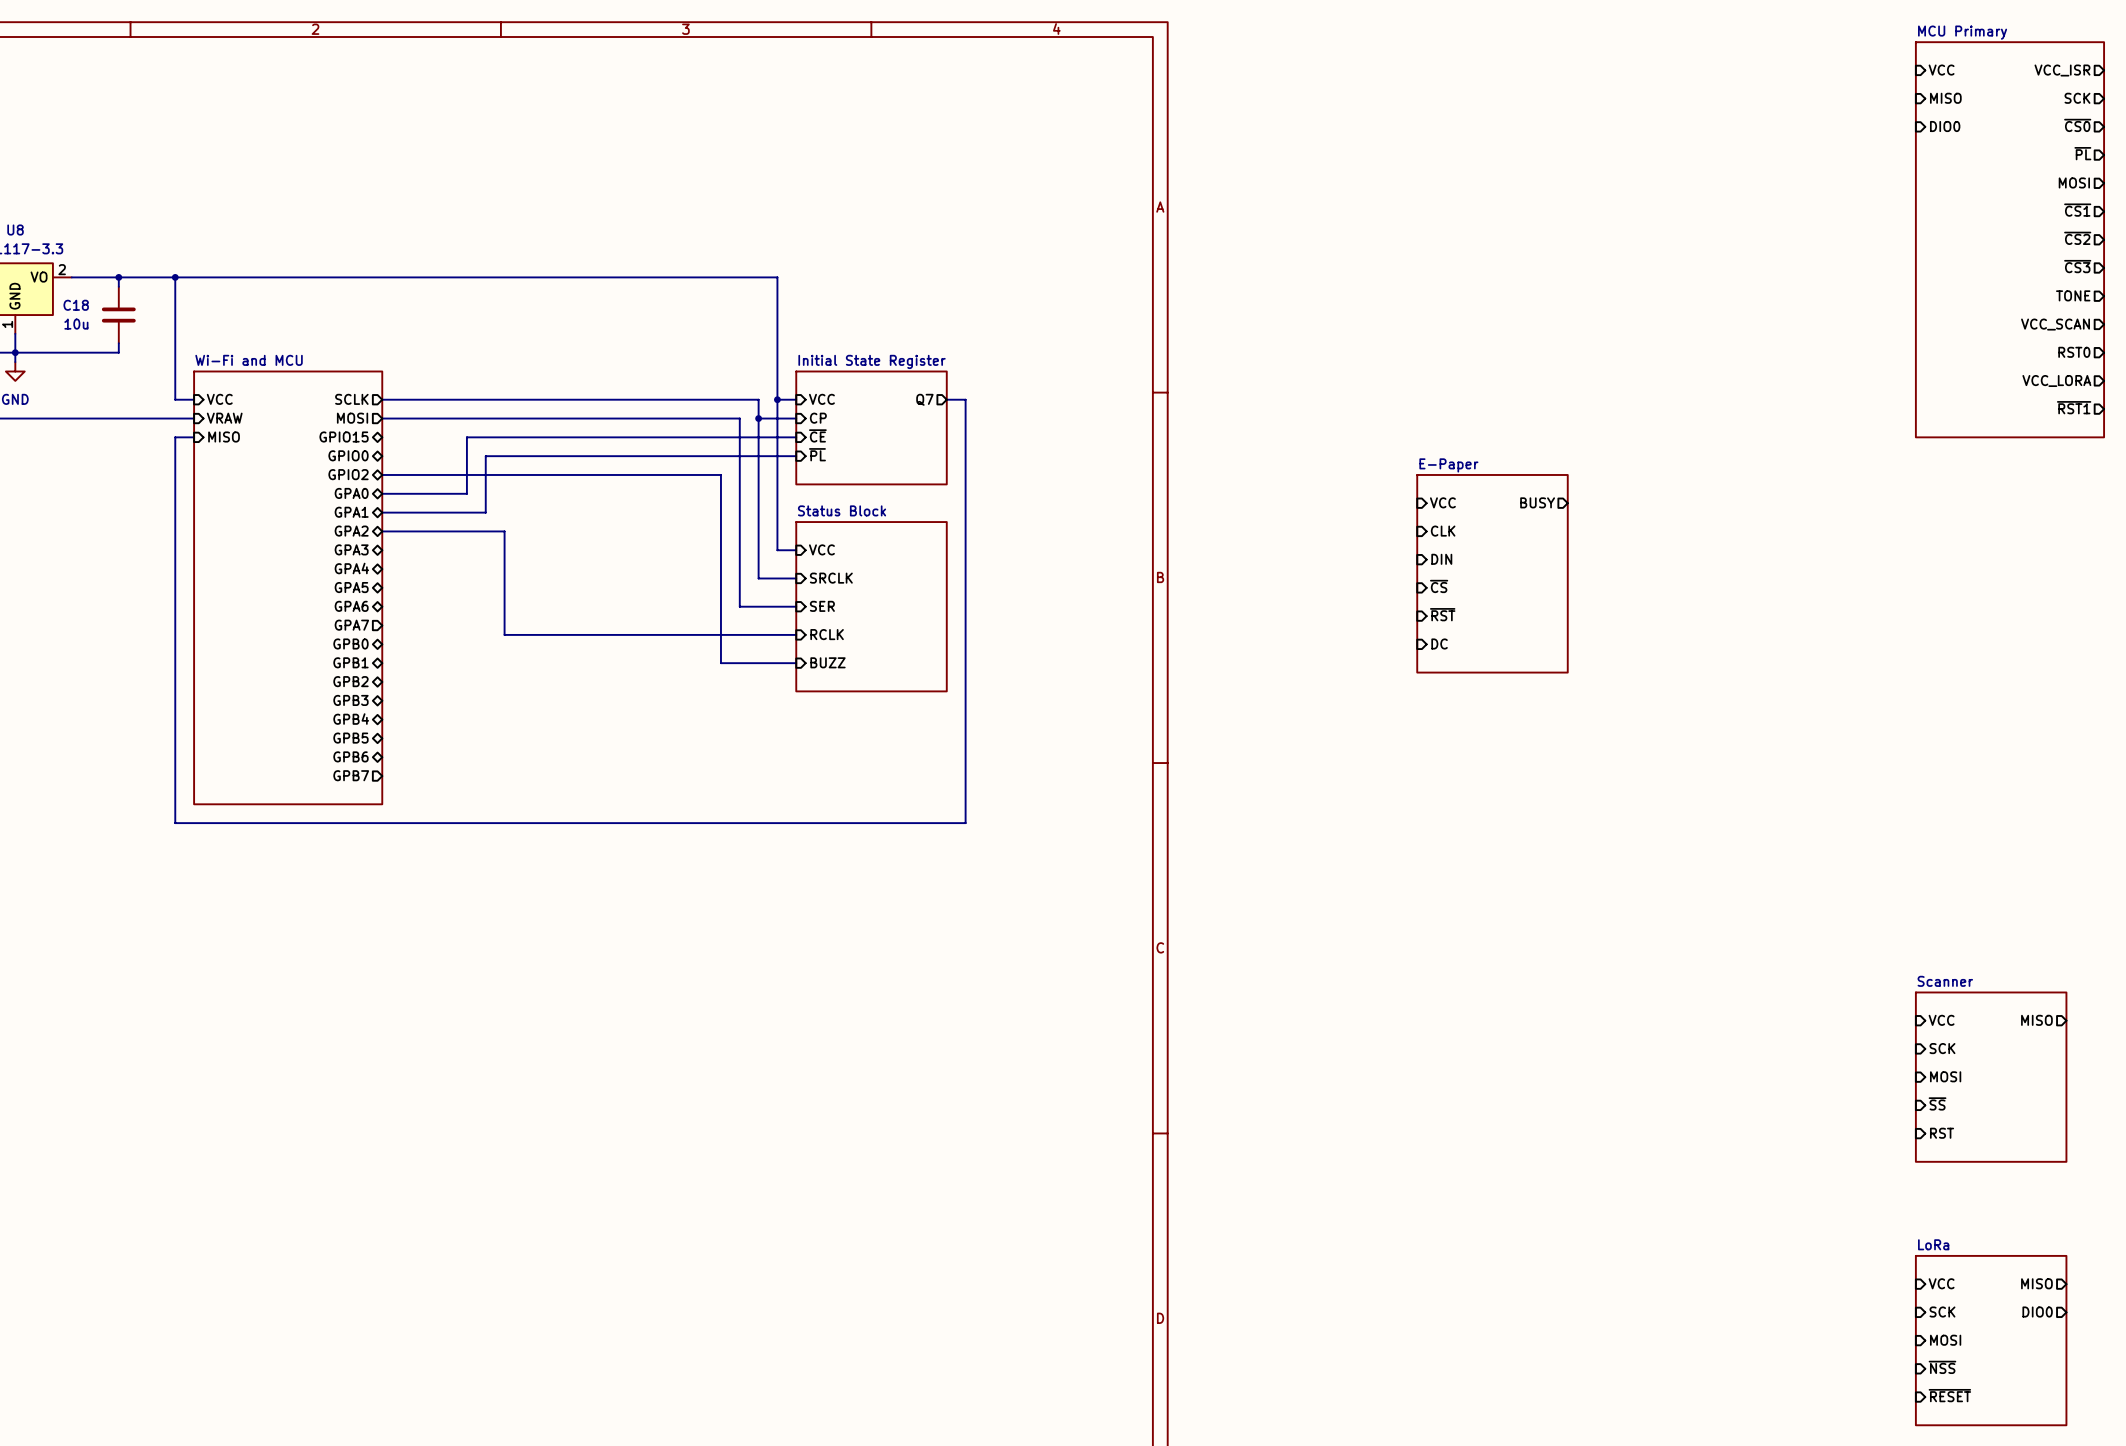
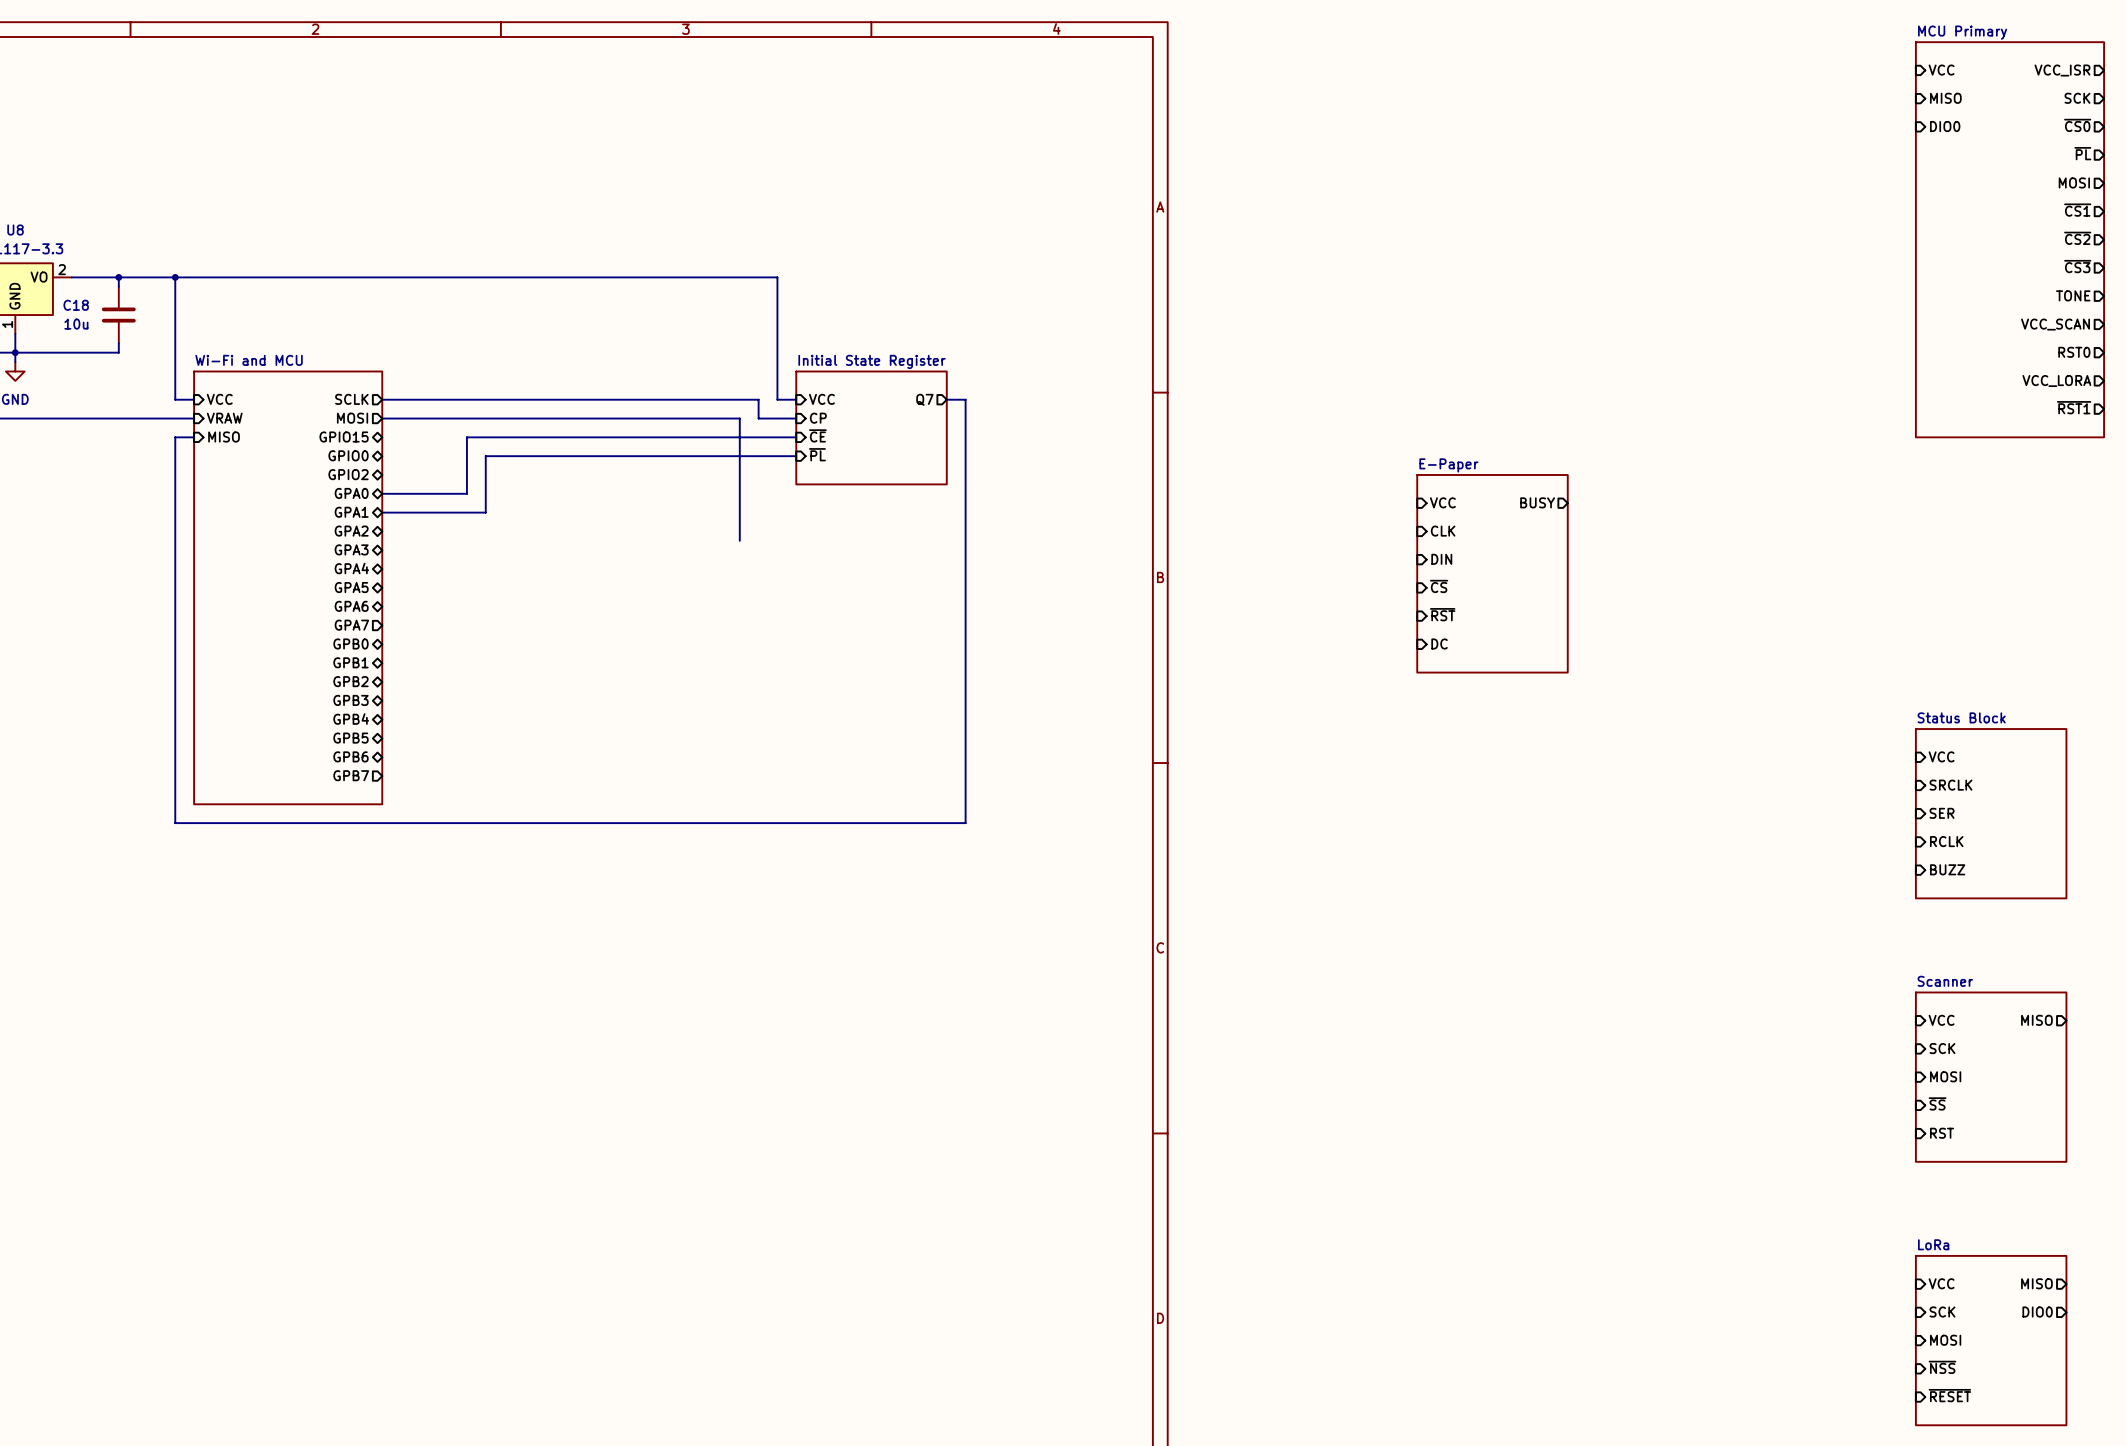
wire: (777, 399) (777, 550) (796, 550) -> none
junction: (777, 399) -> none
wire: (758, 418) (758, 578) (796, 578) -> none
junction: (758, 418) -> none
wire: (382, 474) (720, 474) (720, 663) (796, 663) -> none
wire: (382, 531) (504, 531) (504, 634) (796, 634) -> none
wire: (739, 540) (739, 606) (796, 606) -> none
sheet pin: VCC (821, 549) -> none
sheet pin: SRCLK (831, 578) -> none
sheet pin: SER (822, 606) -> none
sheet Status Block: (871, 606) -> none
sheet pin: RCLK (827, 634) -> none
sheet pin: BUZZ (827, 662) -> none
sheet pin: none -> VCC (1941, 756)
sheet pin: none -> SRCLK (1950, 785)
sheet pin: none -> SER (1942, 813)
sheet Status Block: none -> (1991, 813)
sheet pin: none -> RCLK (1946, 841)
sheet pin: none -> BUZZ (1947, 869)

